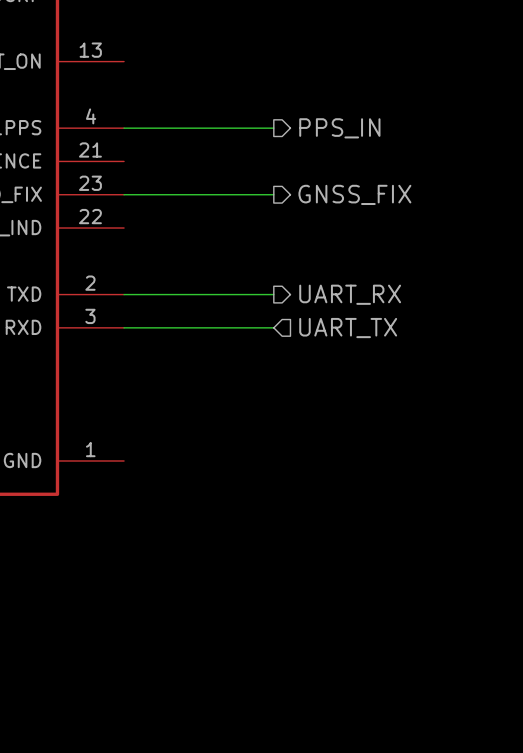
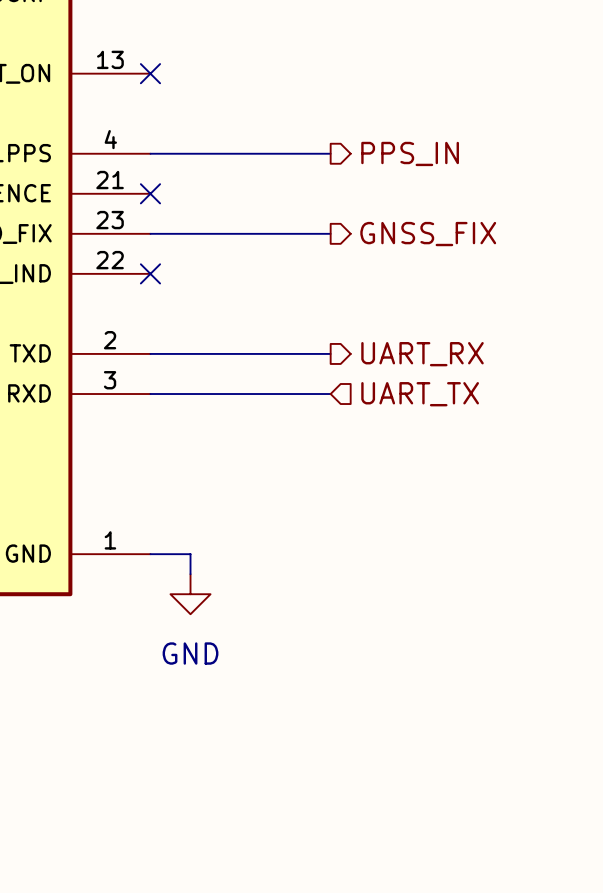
no-connect mark: none -> (150, 73)
no-connect mark: none -> (150, 193)
no-connect mark: none -> (150, 273)
wire: none -> (150, 554) (190, 554) (190, 574)
power symbol: none -> GND (190, 594)

